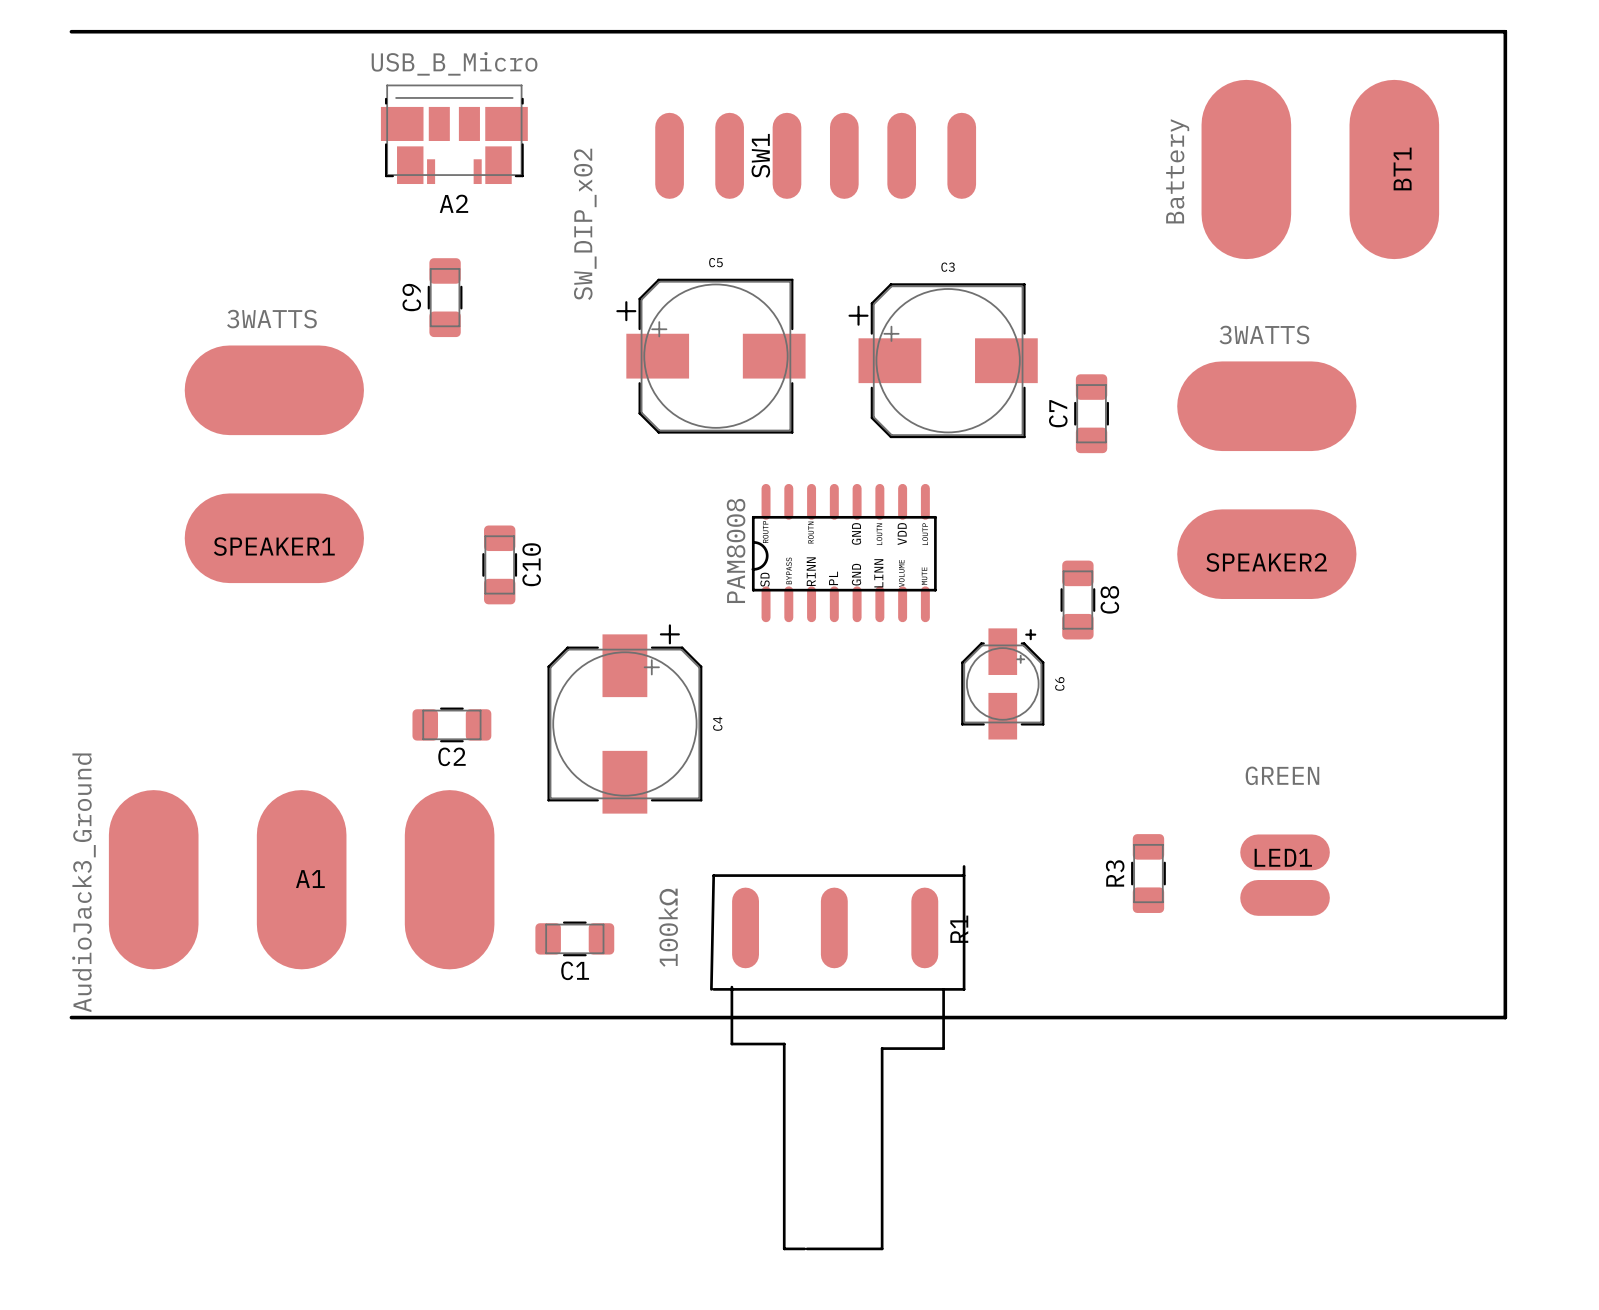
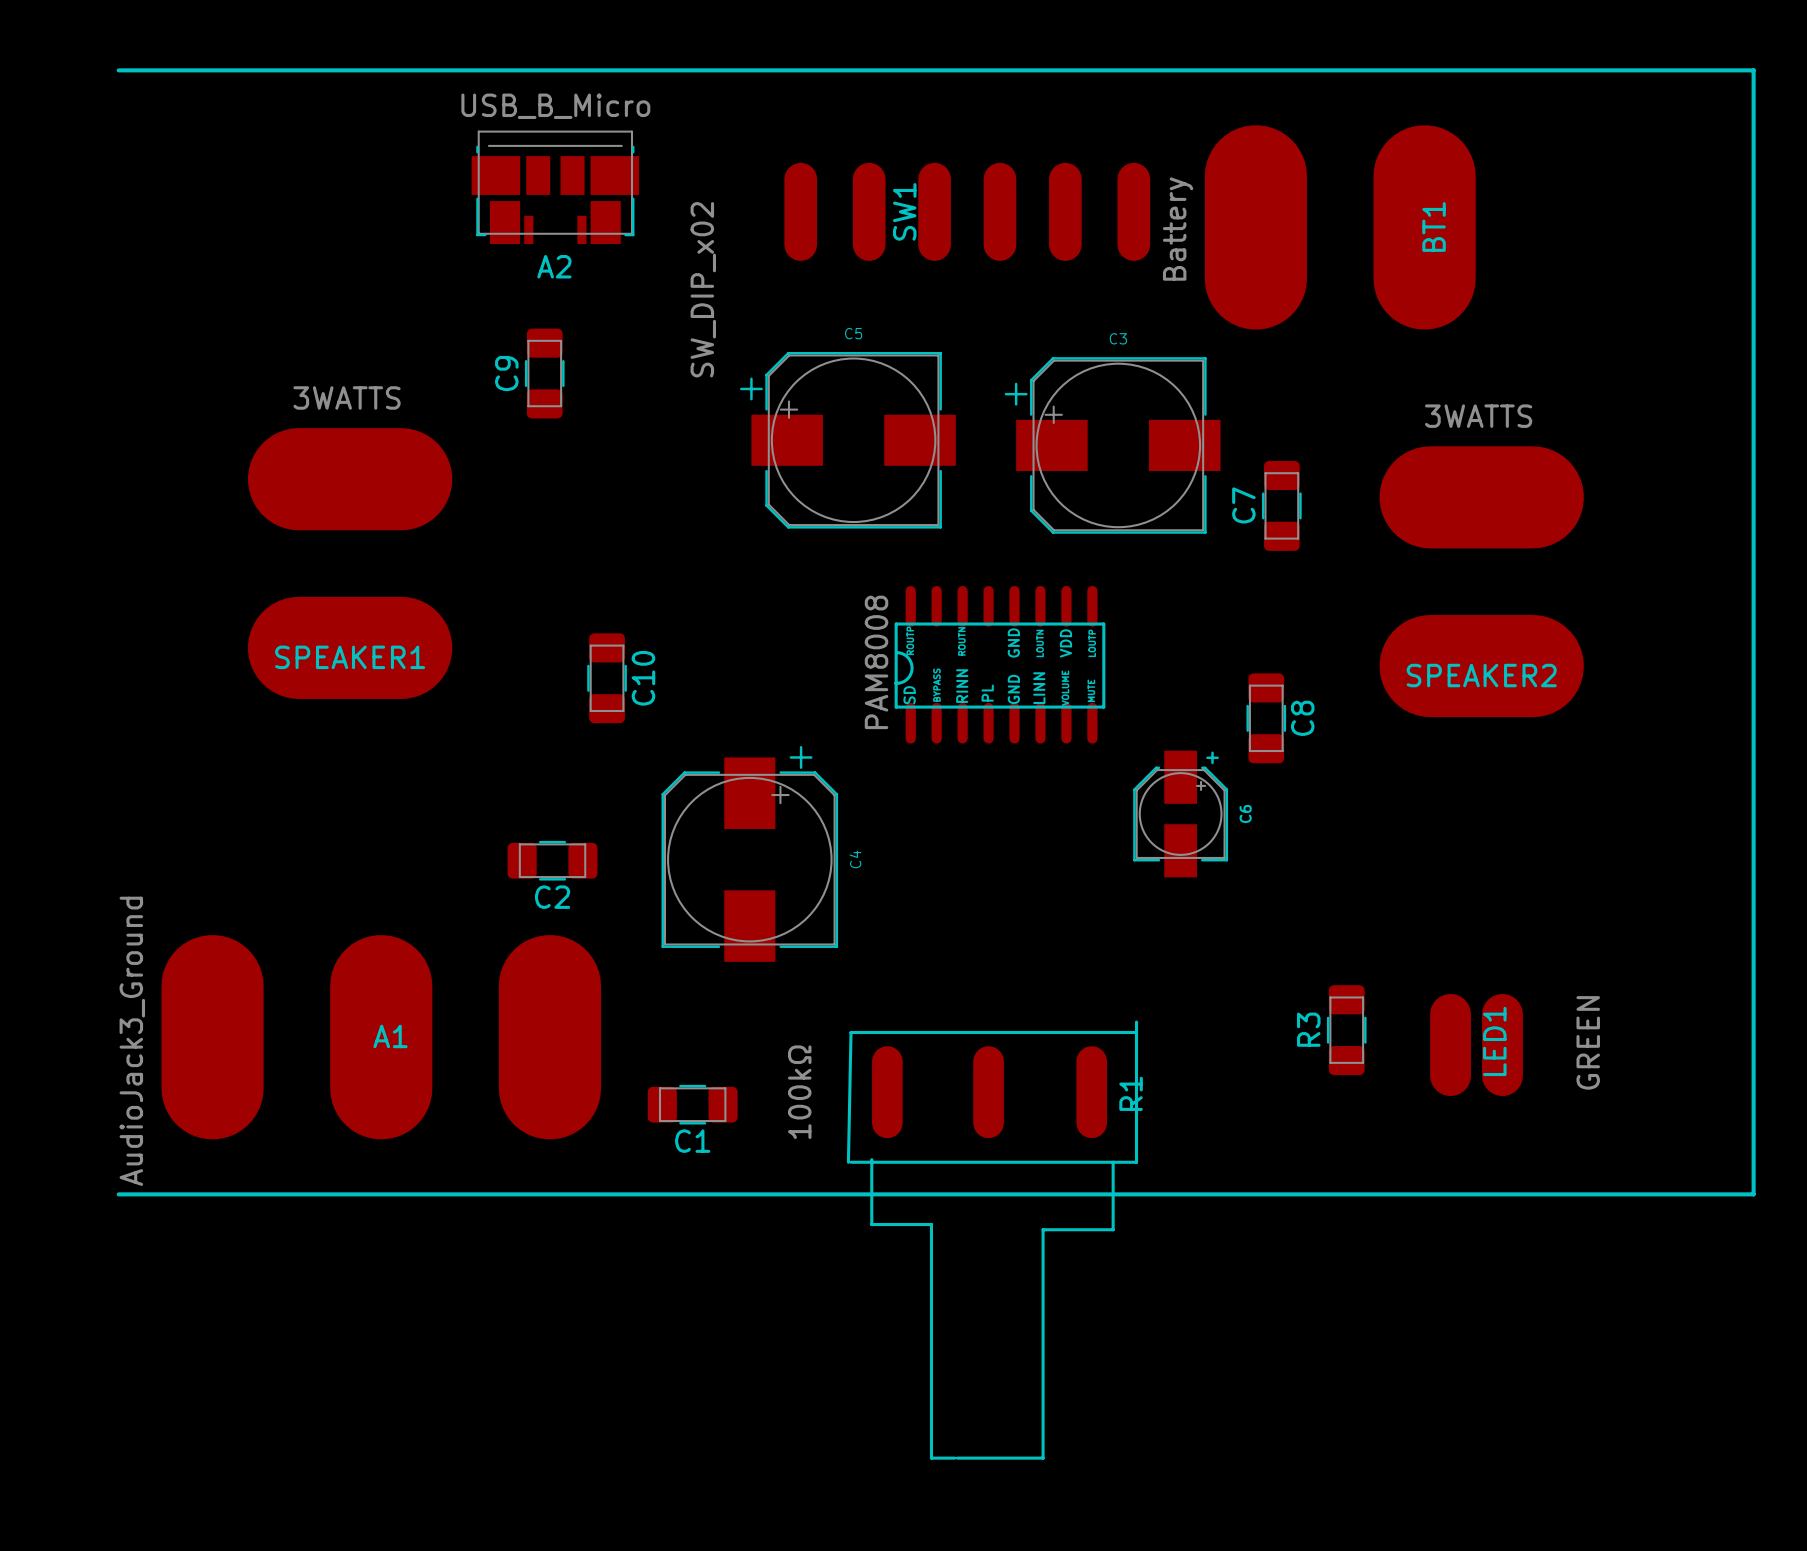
BT1 position: (1320, 169) -> (1340, 227)
LED1 rotation: 0° (1285, 875) -> 90° clockwise (1476, 1045)

